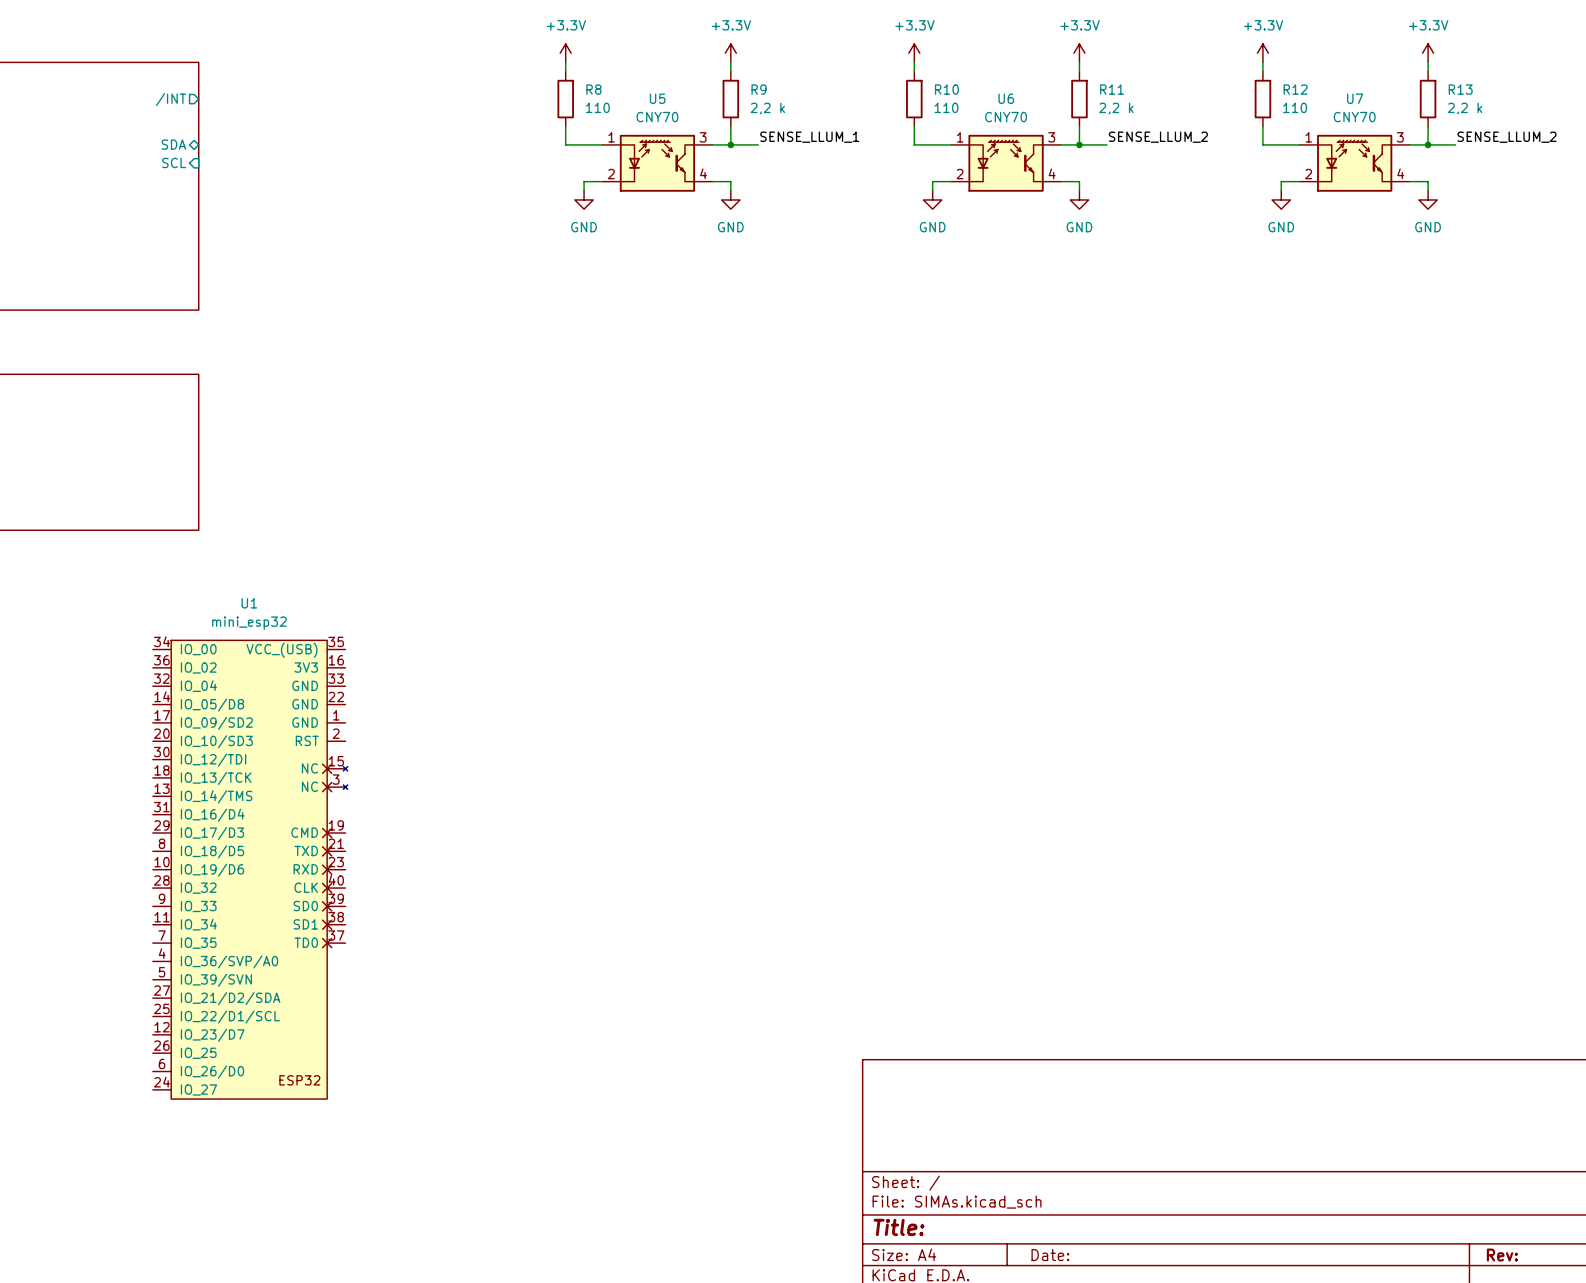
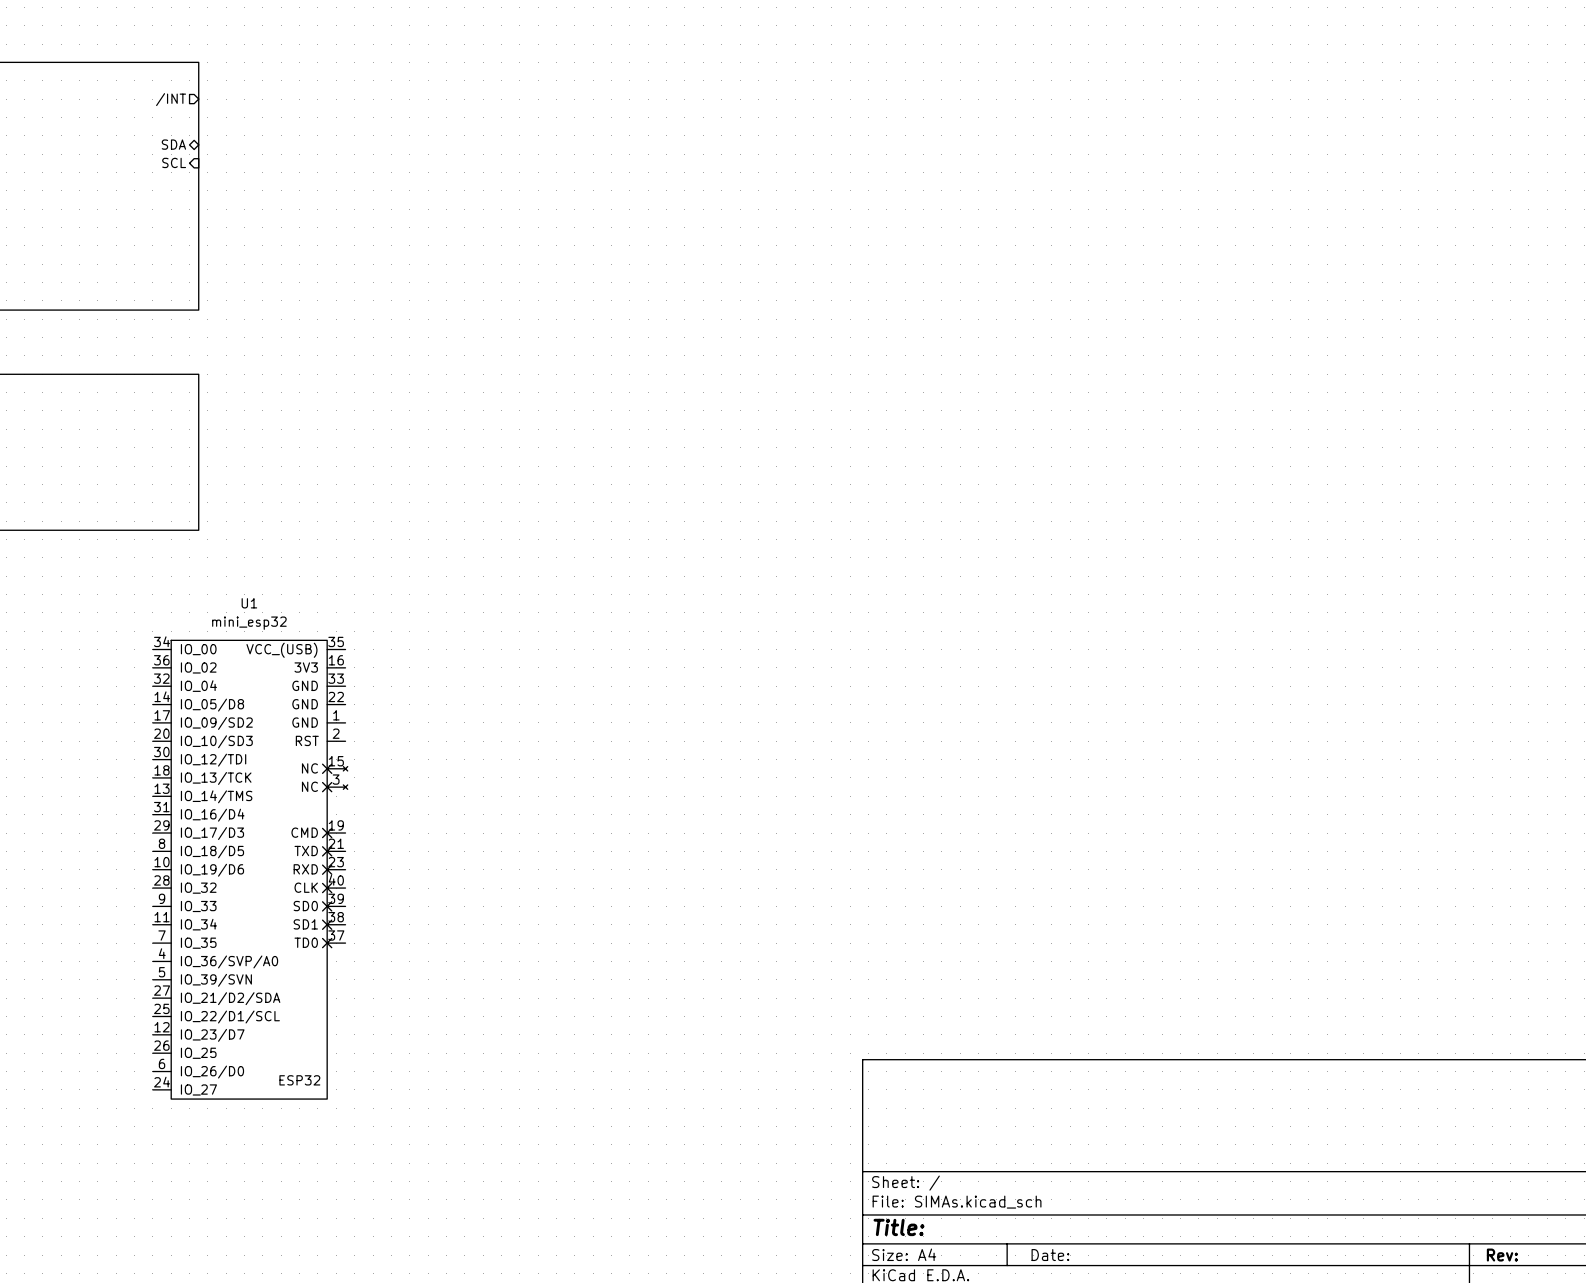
power symbol: +3.3V (565, 53) -> none
power symbol: +3.3V (730, 53) -> none
power symbol: +3.3V (914, 53) -> none
power symbol: +3.3V (1079, 53) -> none
power symbol: +3.3V (1262, 53) -> none
power symbol: +3.3V (1428, 53) -> none
wire: (565, 62) (565, 71) -> none
wire: (730, 62) (730, 71) -> none
wire: (914, 62) (914, 71) -> none
wire: (1079, 62) (1079, 71) -> none
wire: (1262, 62) (1262, 71) -> none
wire: (1428, 62) (1428, 71) -> none
R8: 110 (565, 99) -> none
R9: 2,2 k (730, 99) -> none
R10: 110 (914, 99) -> none
R11: 2,2 k (1079, 99) -> none
R12: 110 (1262, 99) -> none
R13: 2,2 k (1428, 99) -> none
wire: (565, 126) (565, 144) (602, 144) -> none
wire: (730, 126) (730, 144) -> none
wire: (914, 126) (914, 144) (951, 144) -> none
wire: (1079, 126) (1079, 144) -> none
wire: (1262, 126) (1262, 144) (1299, 144) -> none
wire: (1428, 126) (1428, 144) -> none
label: SENSE_LLUM_1 (809, 137) -> none
label: SENSE_LLUM_2 (1158, 137) -> none
label: SENSE_LLUM_2 (1506, 137) -> none
wire: (712, 144) (758, 144) -> none
junction: (730, 144) -> none
wire: (1061, 144) (1106, 144) -> none
junction: (1079, 144) -> none
wire: (1409, 144) (1455, 144) -> none
junction: (1428, 144) -> none
U5: CNY70 (657, 163) -> none
U6: CNY70 (1006, 163) -> none
U7: CNY70 (1354, 163) -> none
wire: (602, 181) (584, 181) (584, 190) -> none
wire: (712, 181) (730, 181) (730, 190) -> none
wire: (951, 181) (932, 181) (932, 190) -> none
wire: (1061, 181) (1079, 181) (1079, 190) -> none
wire: (1299, 181) (1281, 181) (1281, 190) -> none
wire: (1409, 181) (1428, 181) (1428, 190) -> none
power symbol: GND (584, 199) -> none
power symbol: GND (730, 199) -> none
power symbol: GND (932, 199) -> none
power symbol: GND (1079, 199) -> none
power symbol: GND (1281, 199) -> none
power symbol: GND (1428, 199) -> none

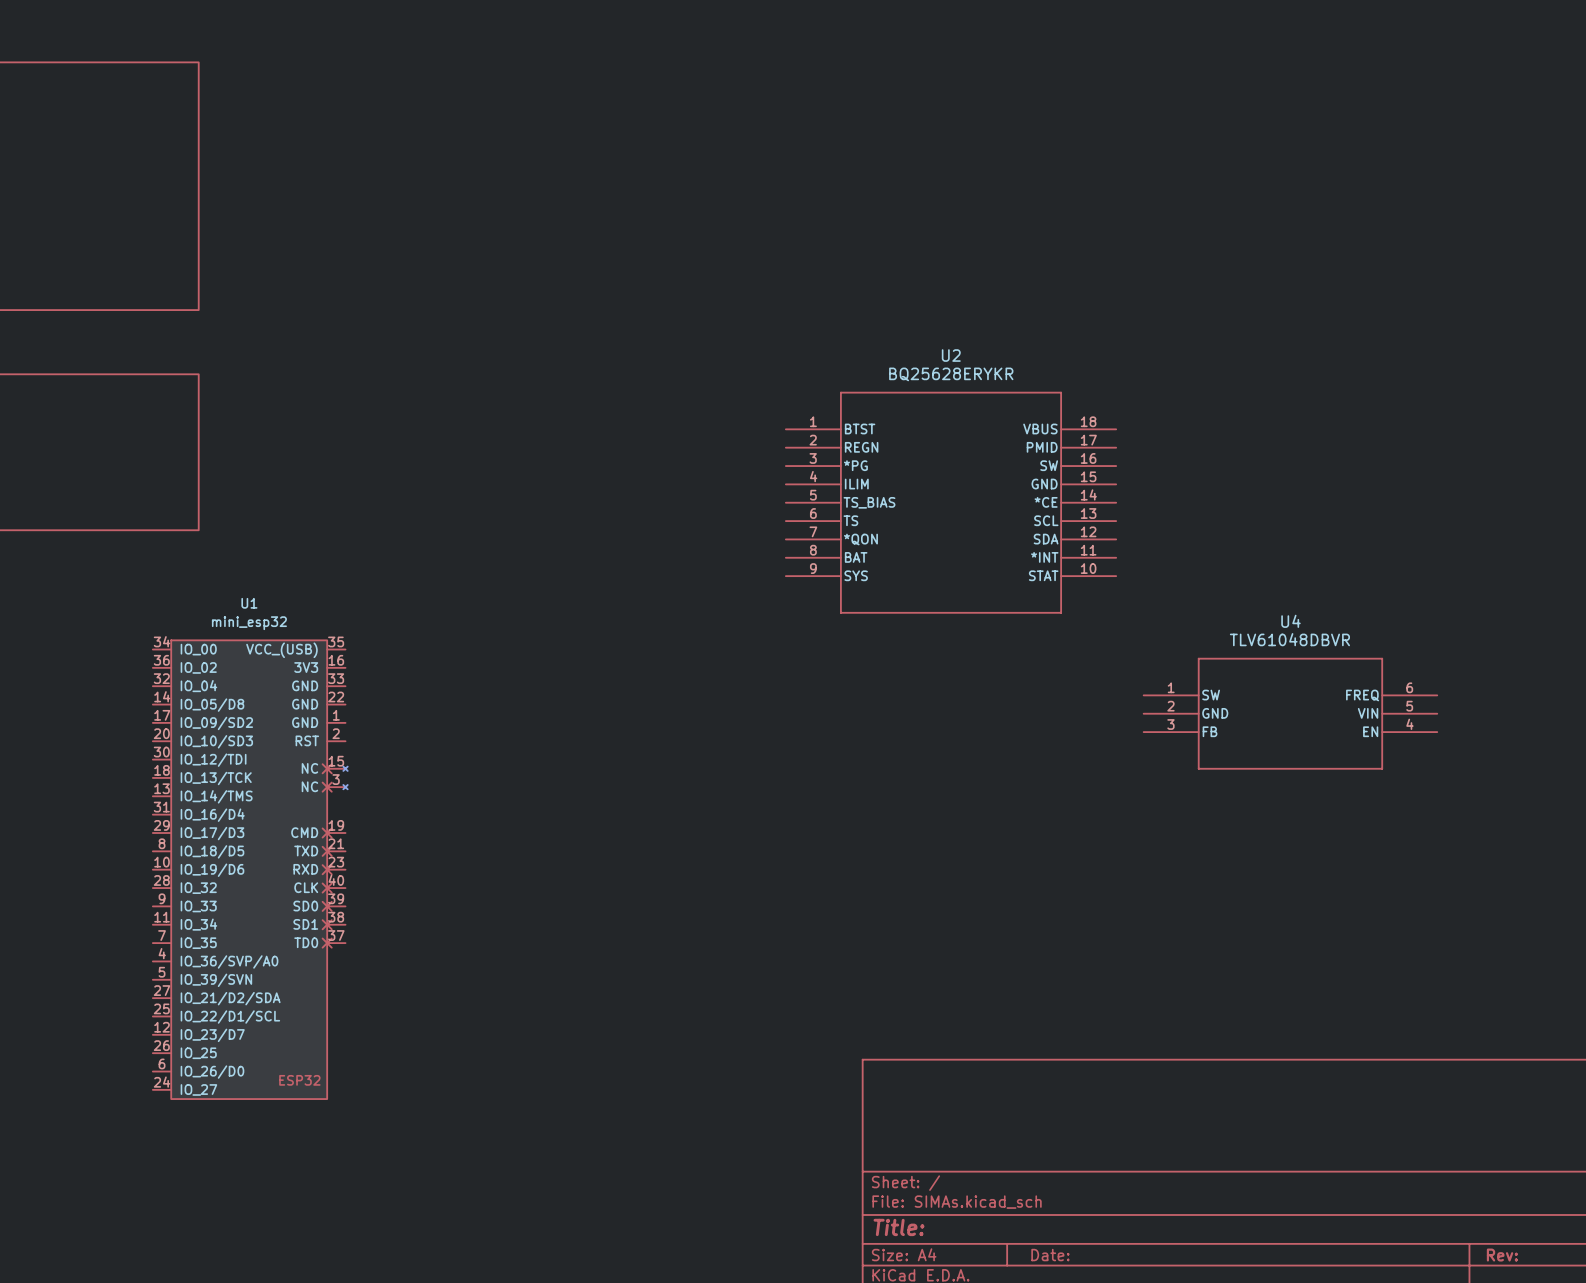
sheet pin: /INT (171, 99) -> none
sheet pin: SDA (173, 144) -> none
sheet pin: SCL (174, 162) -> none
U2: none -> BQ25628ERYKR (951, 502)
U4: none -> TLV61048DBVR (1290, 713)

